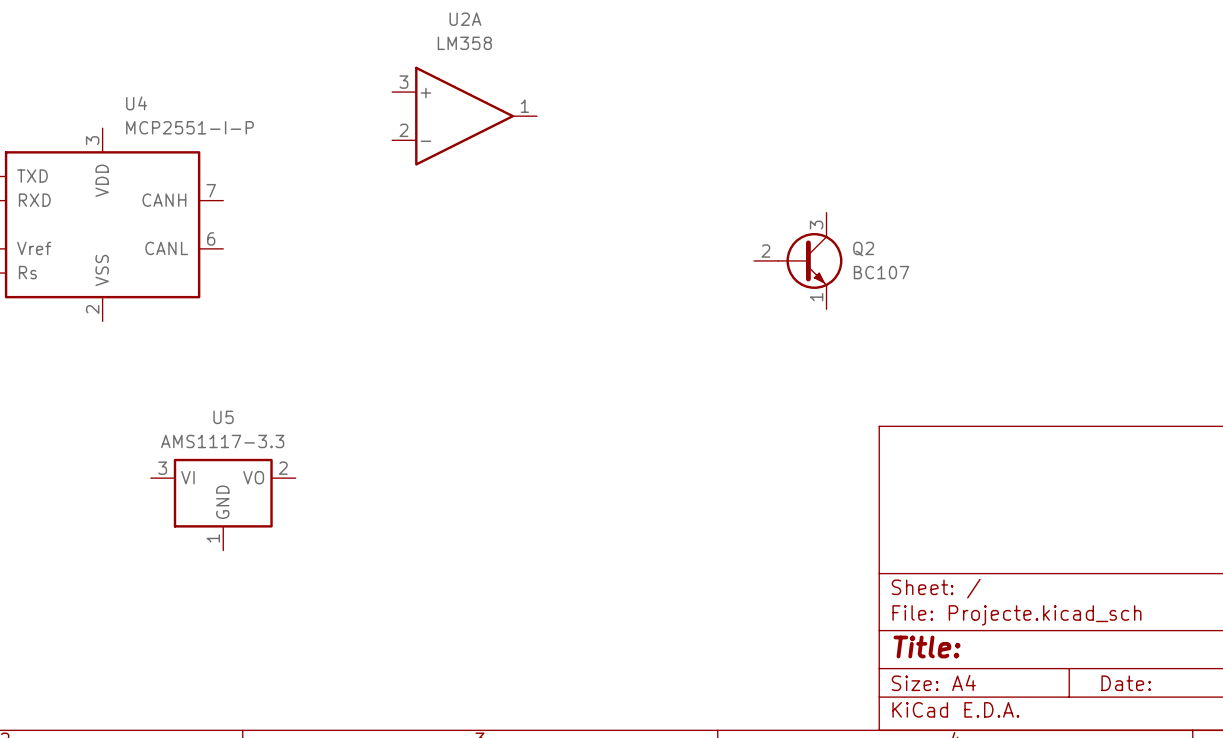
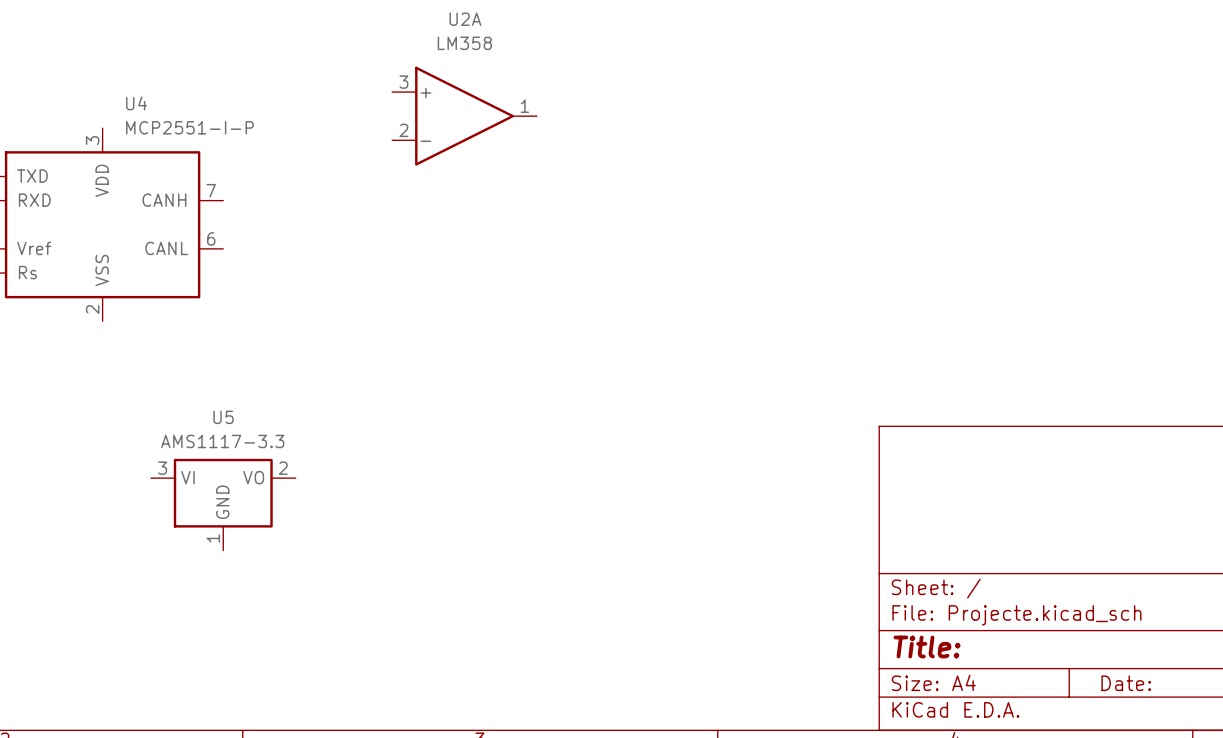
Q2: BC107 (798, 260) -> none

